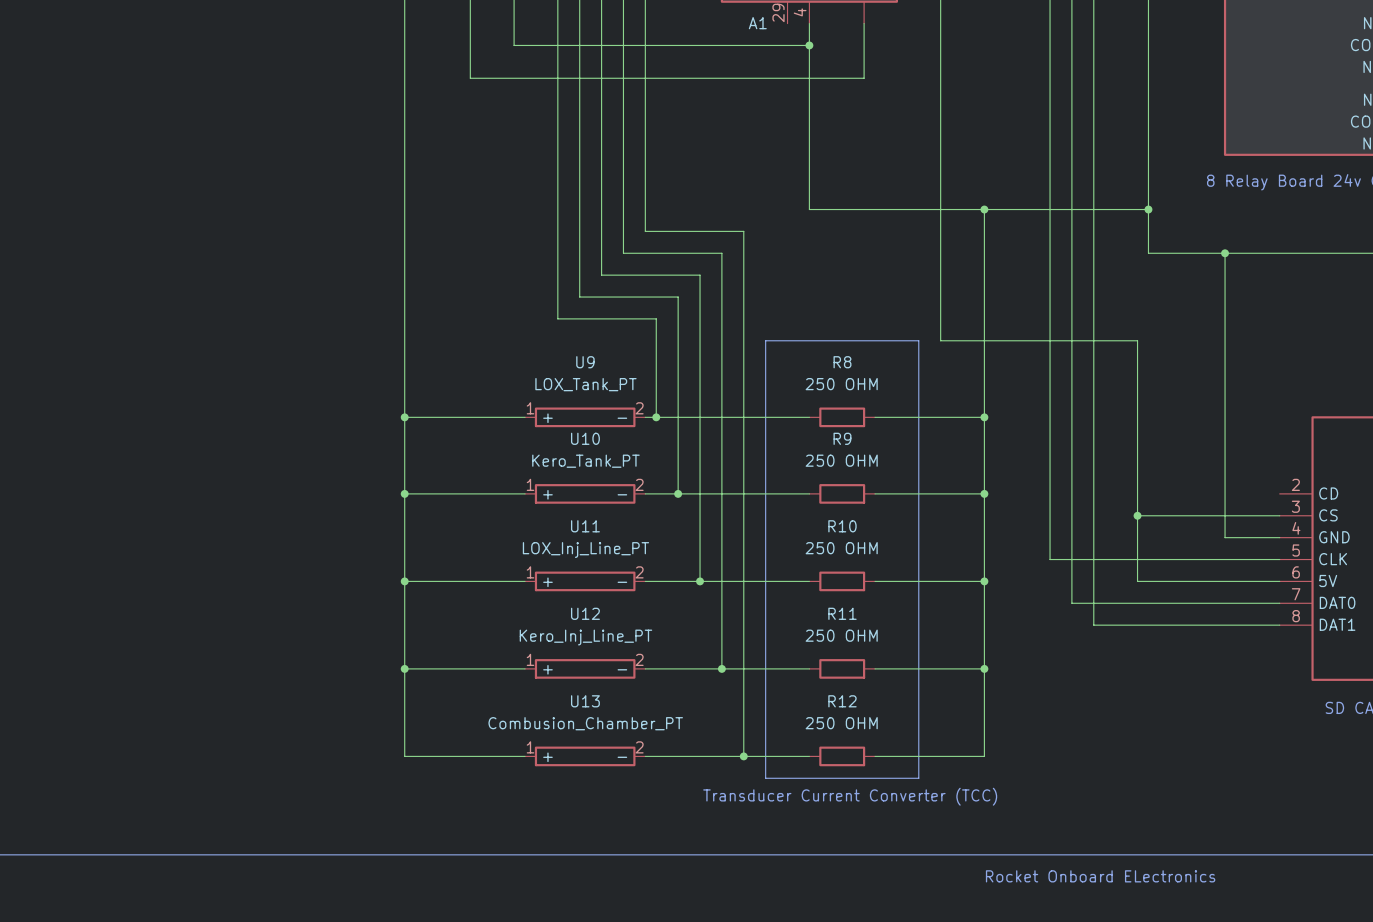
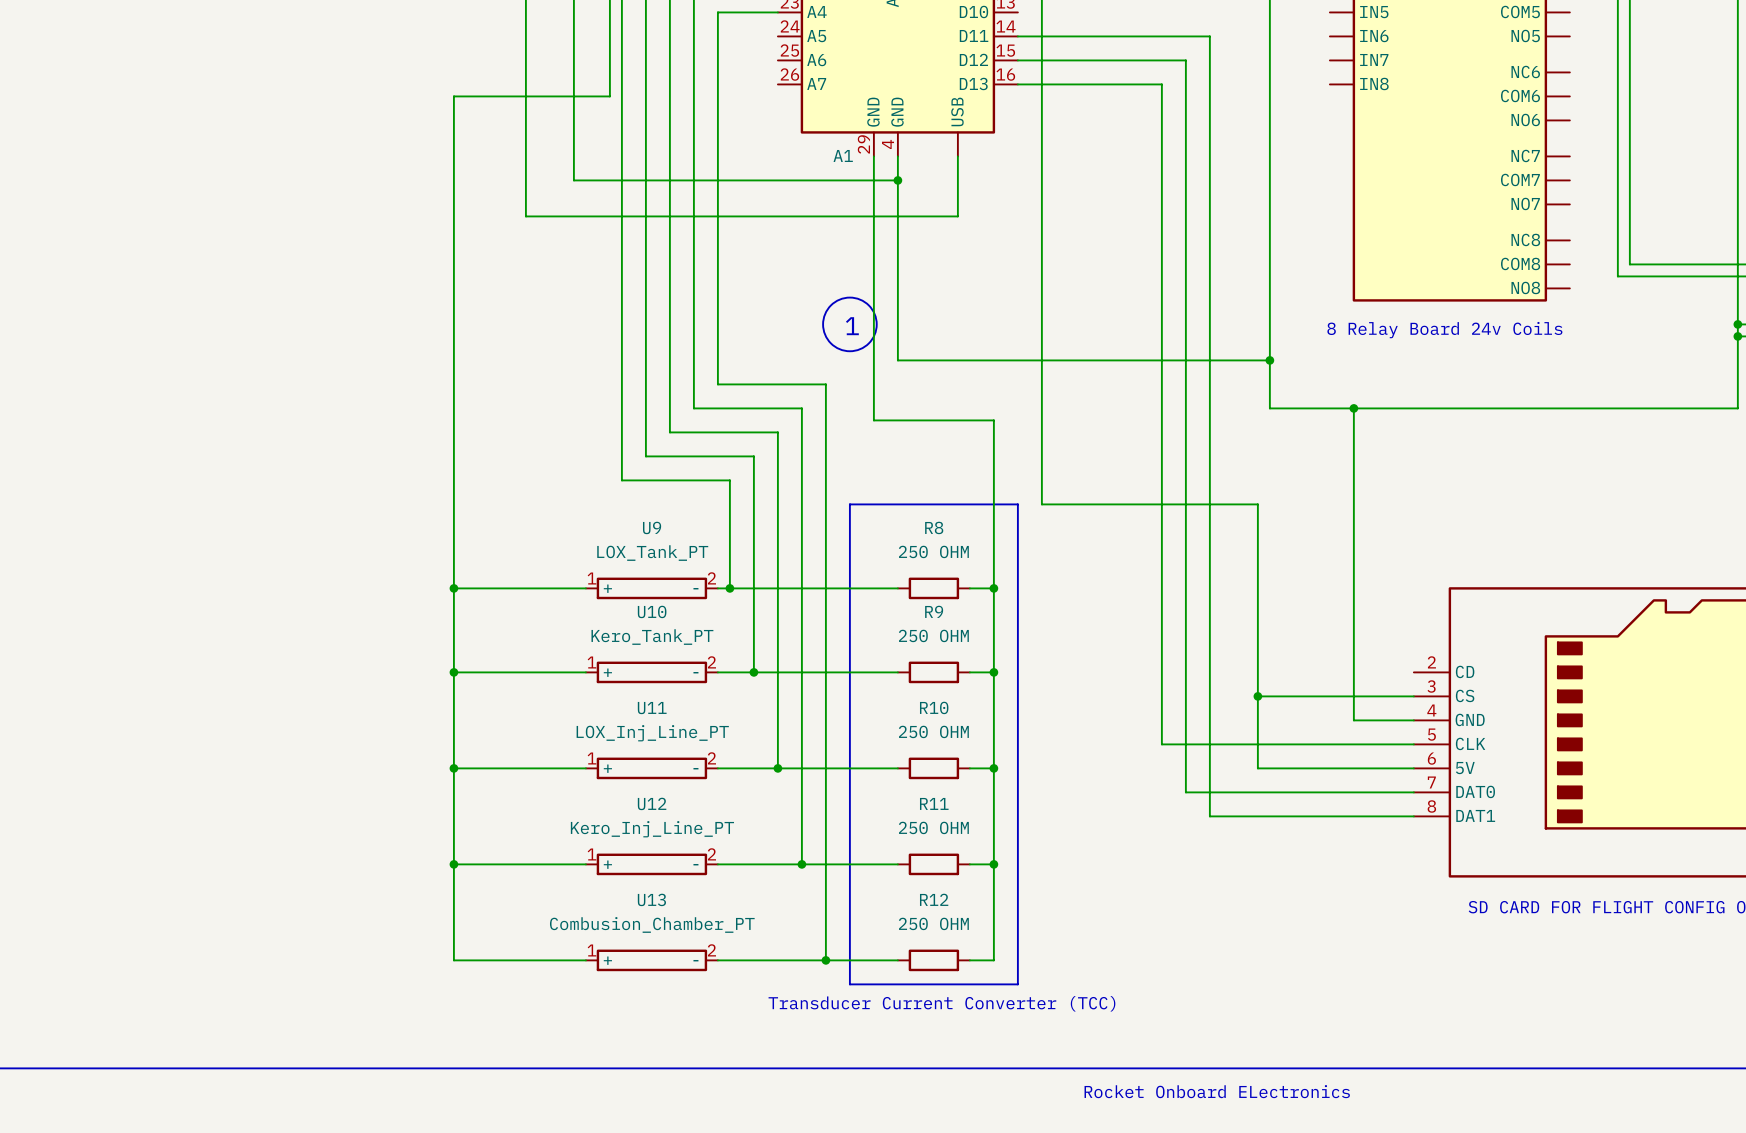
drawing: none -> [823, 297, 877, 352]
text: none -> 1 (852, 326)
wire: (984, 209) (984, 756) (896, 756) -> (873, 156) (873, 420) (993, 420) (993, 960)
junction: (984, 209) -> none
wire: (896, 417) (984, 417) -> none
junction: none -> (993, 588)
junction: (984, 417) -> none
wire: (896, 493) (984, 493) -> none
junction: none -> (993, 672)
junction: (984, 493) -> none
wire: (896, 581) (984, 581) -> none
junction: none -> (993, 768)
junction: (984, 581) -> none
wire: (896, 668) (984, 668) -> none
junction: none -> (993, 864)
junction: (984, 668) -> none

